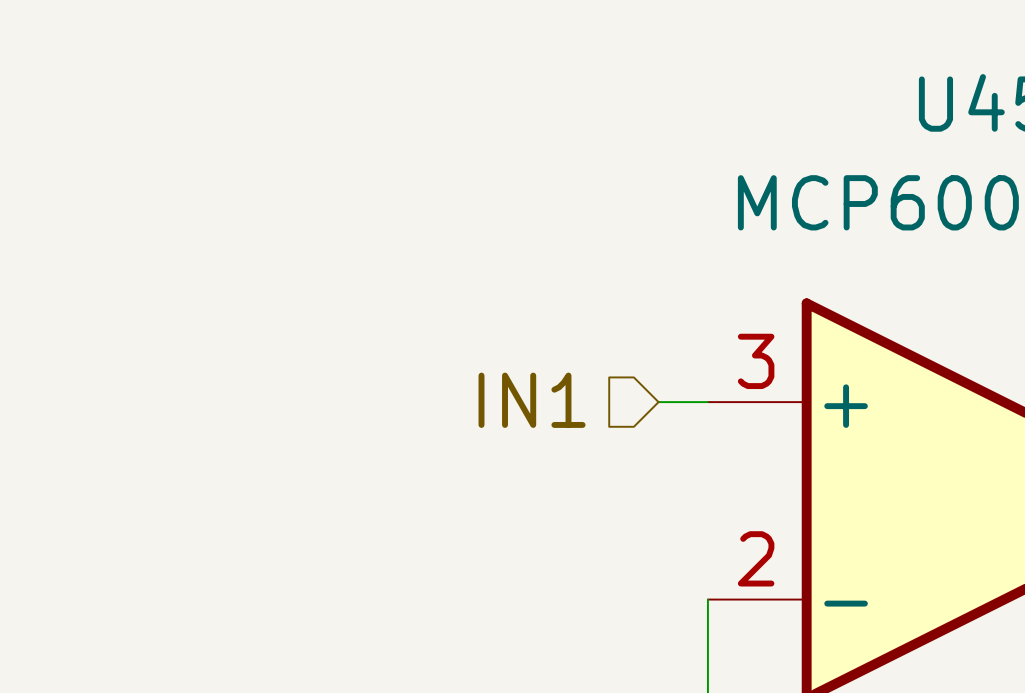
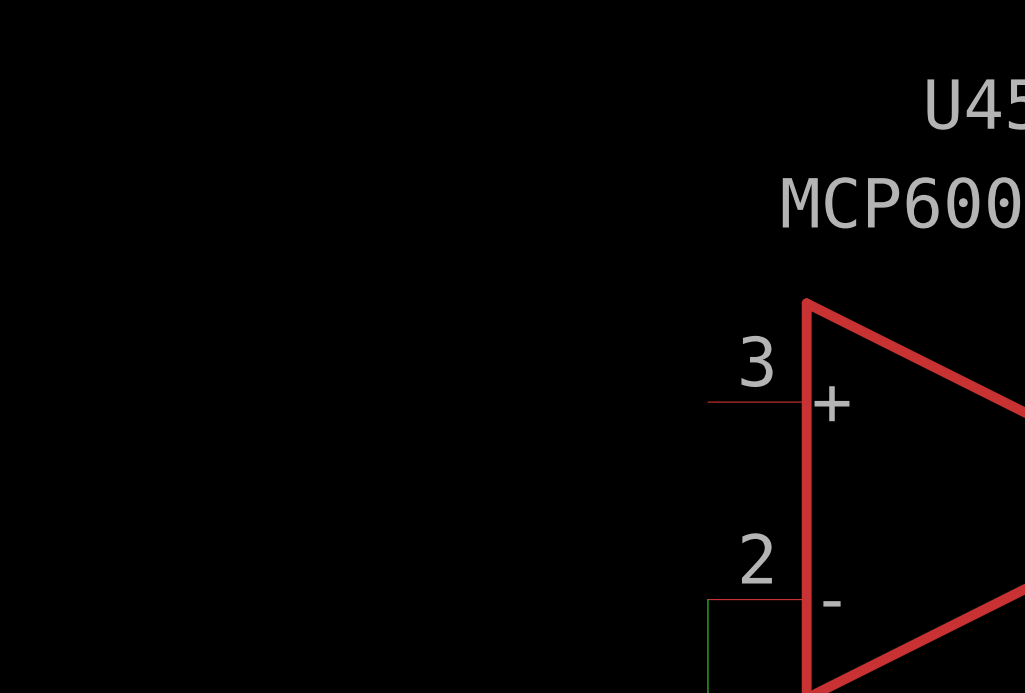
hierarchical label: IN1 (532, 400) -> none
wire: (658, 402) (707, 402) -> none

